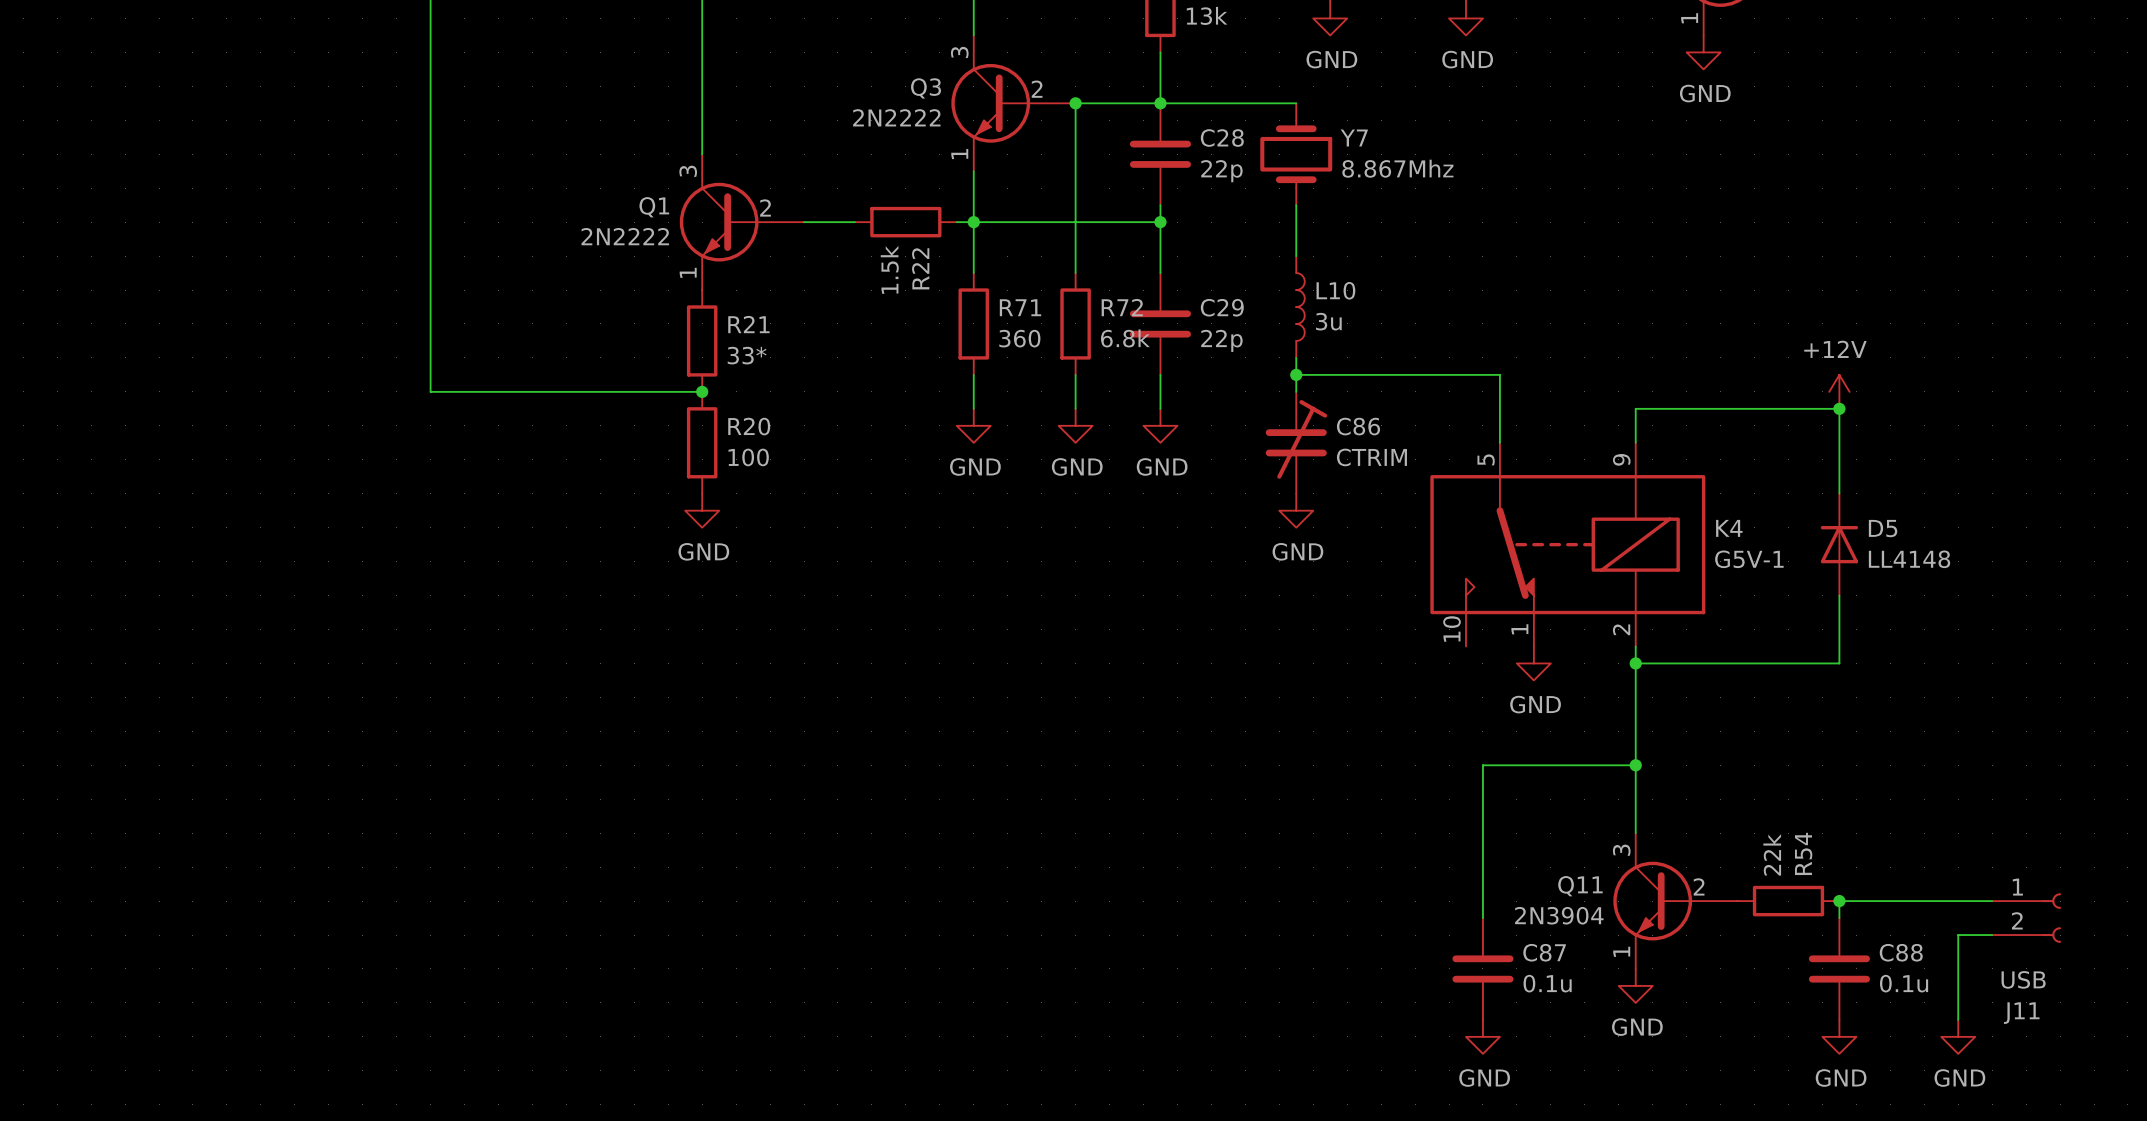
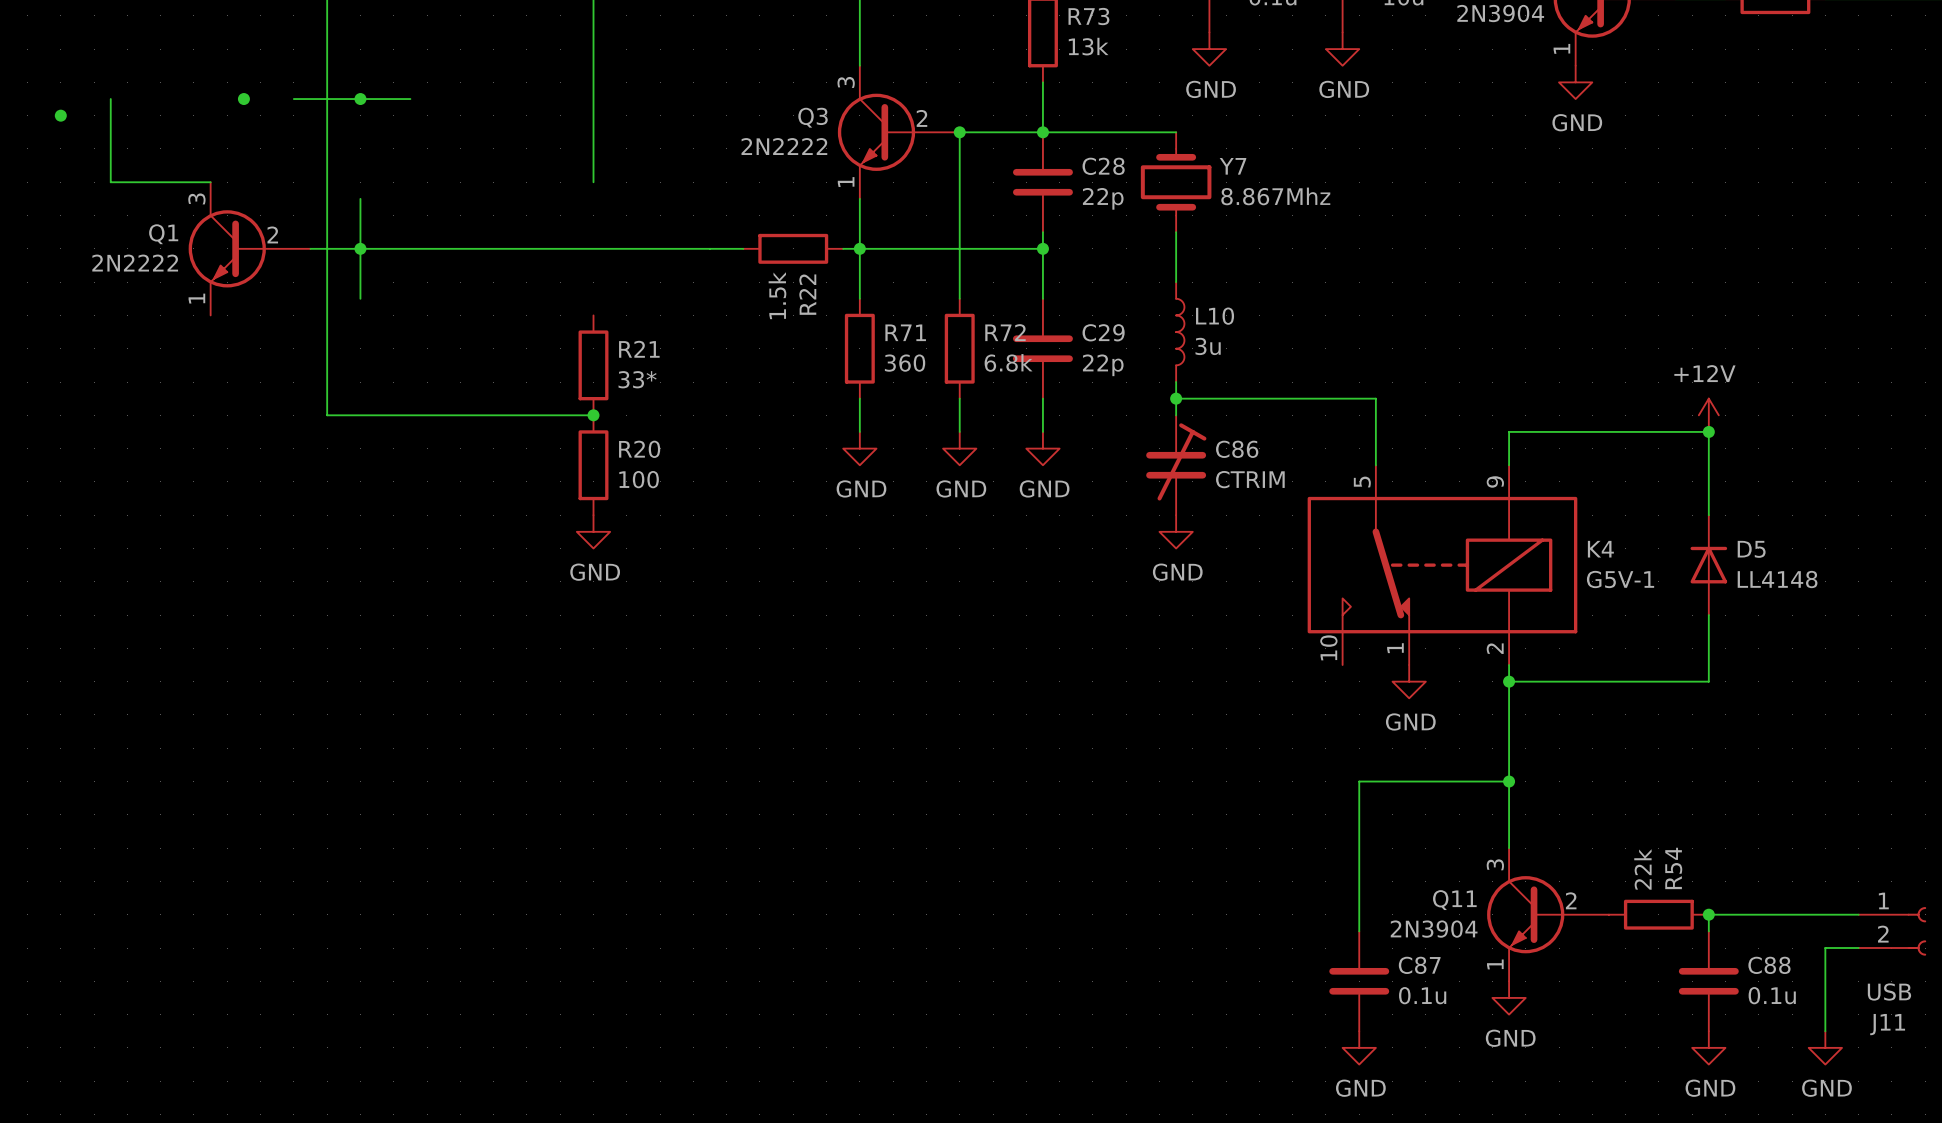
wire: none -> (110, 99) (110, 182) (210, 182)
junction: none -> (243, 99)
wire: none -> (293, 99) (410, 99)
junction: none -> (360, 99)
junction: none -> (60, 115)
wire: none -> (360, 198) (360, 298)
wire: none -> (310, 248) (693, 248)
junction: none -> (360, 248)
Q1 position: (741, 222) -> (249, 248)

